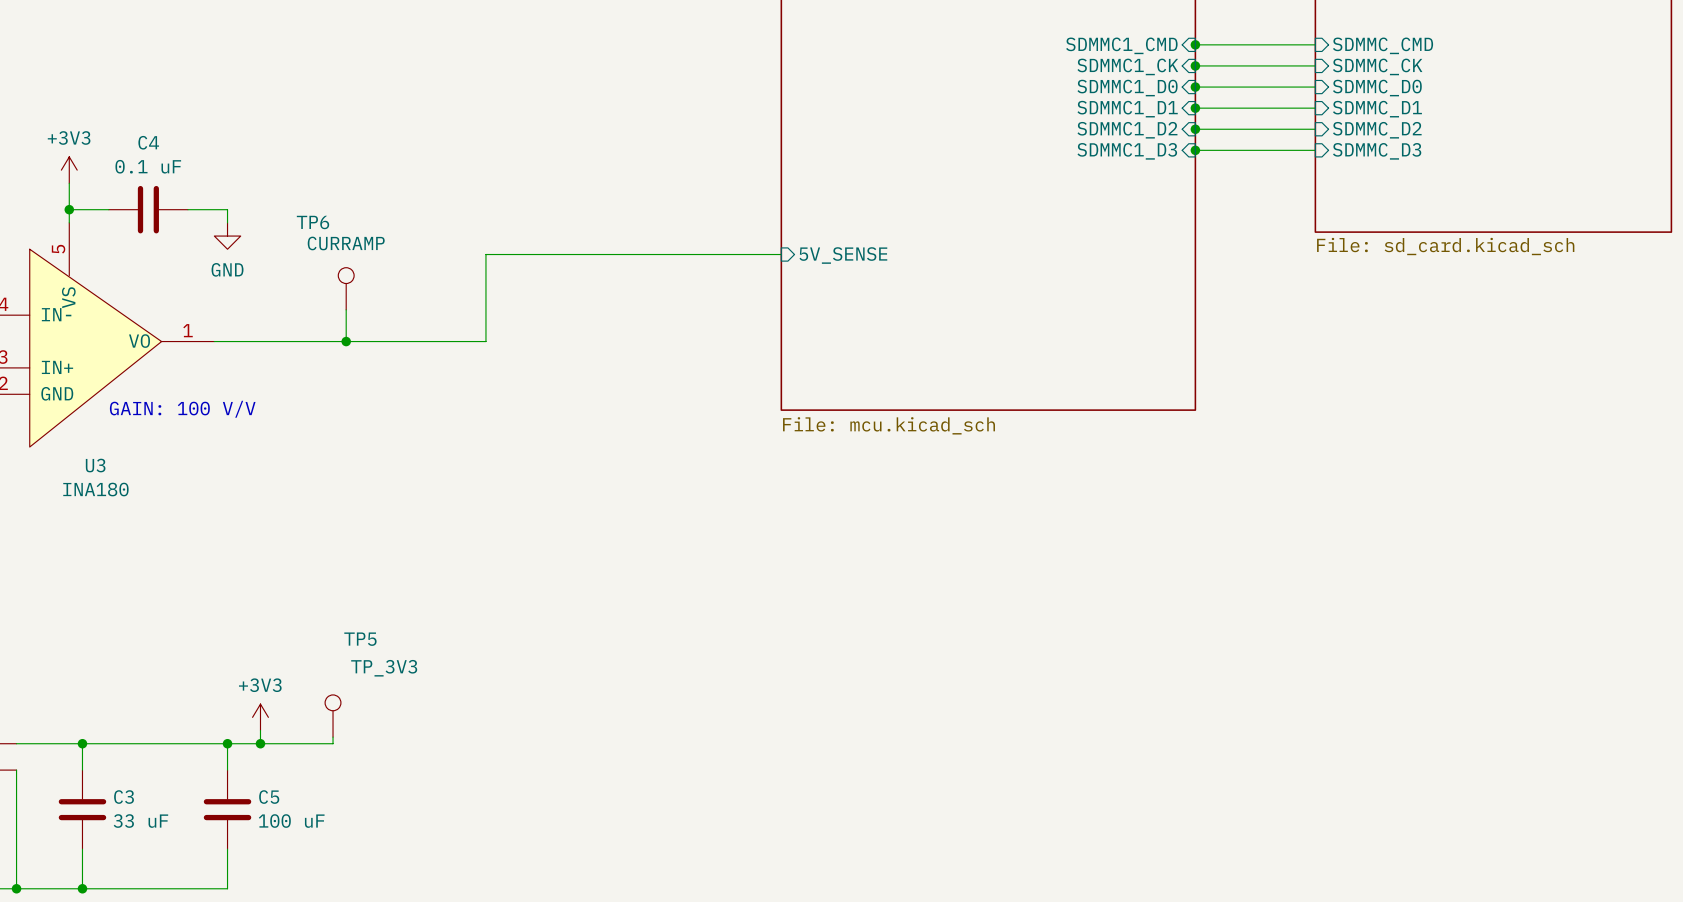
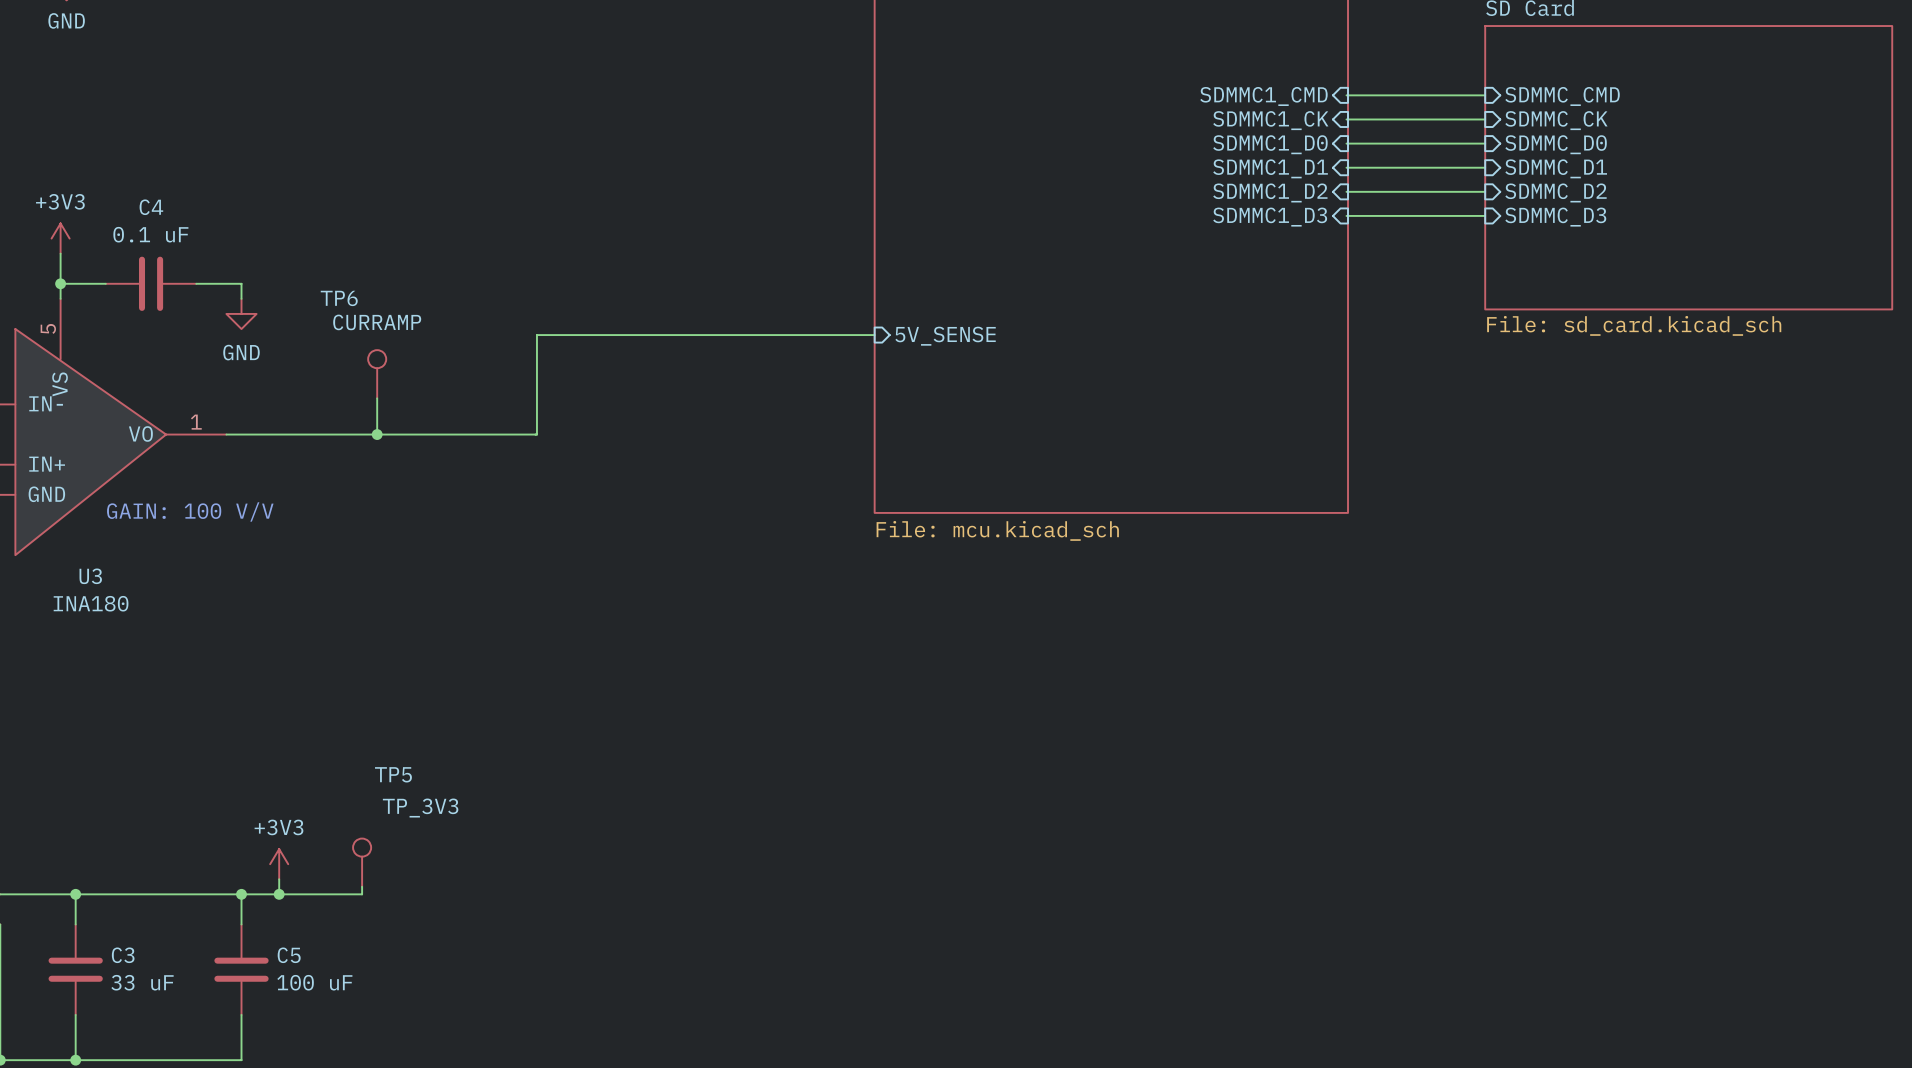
junction: (1195, 44) -> none
junction: (1195, 65) -> none
junction: (1195, 87) -> none
junction: (1195, 108) -> none
junction: (1195, 129) -> none
junction: (1195, 150) -> none

